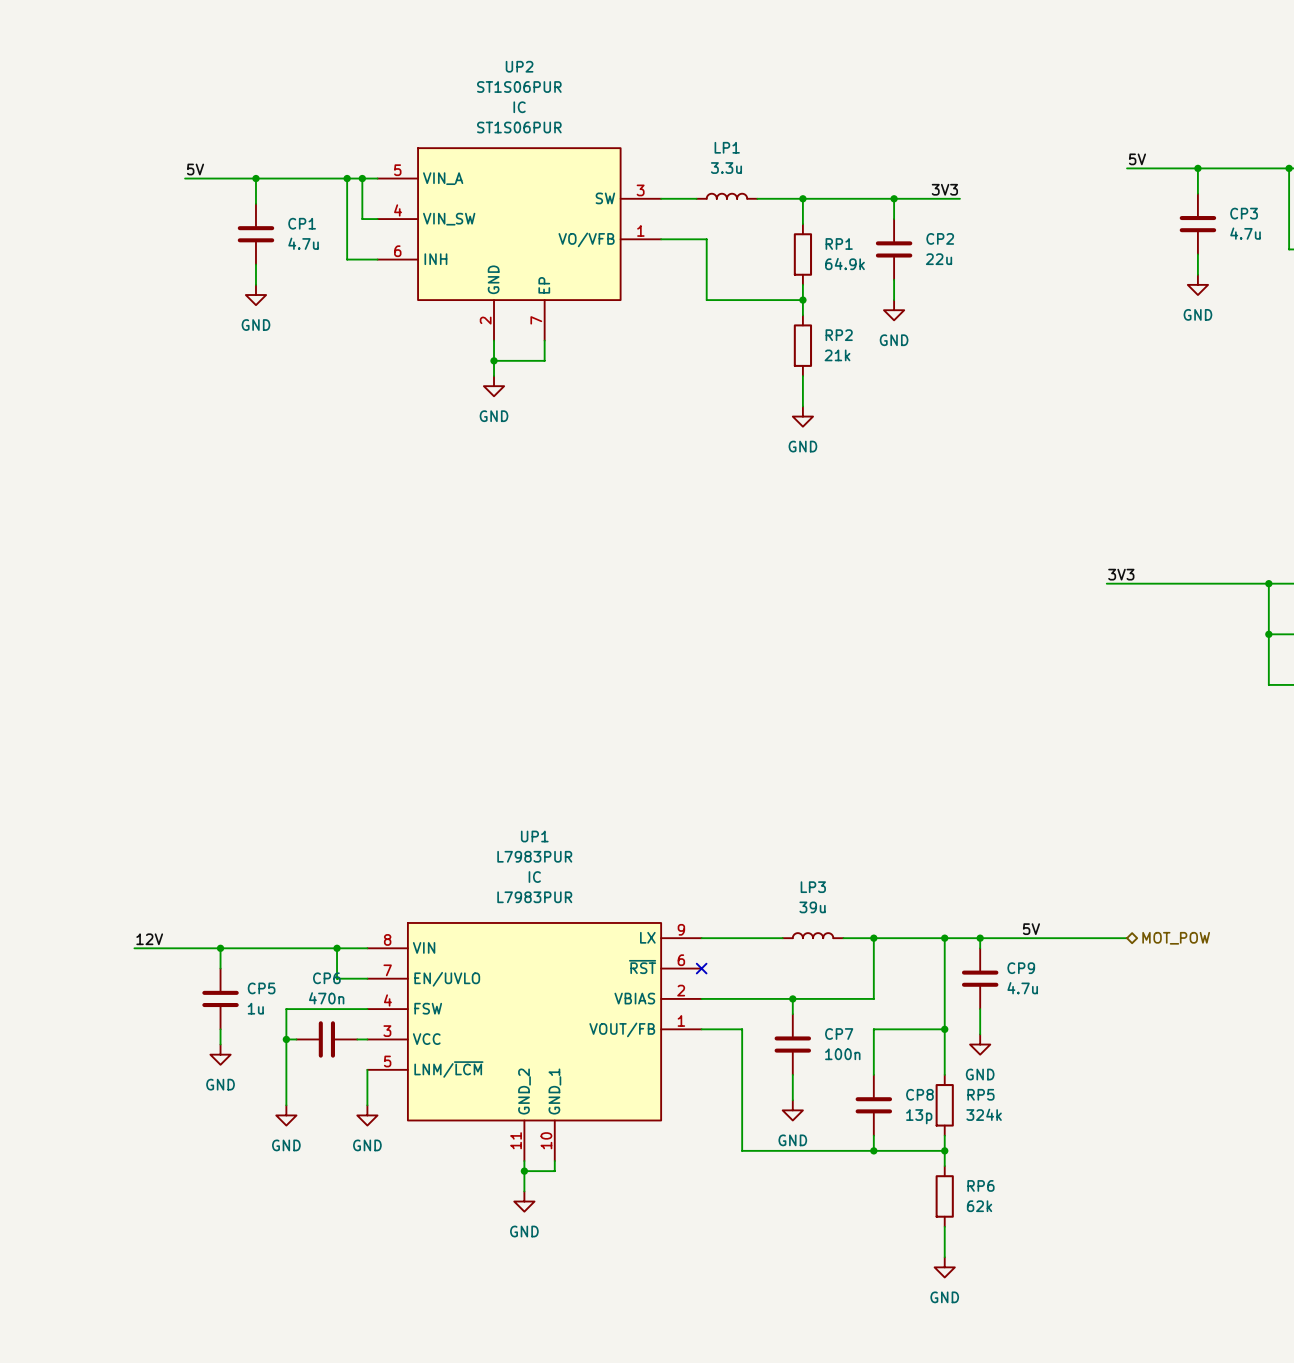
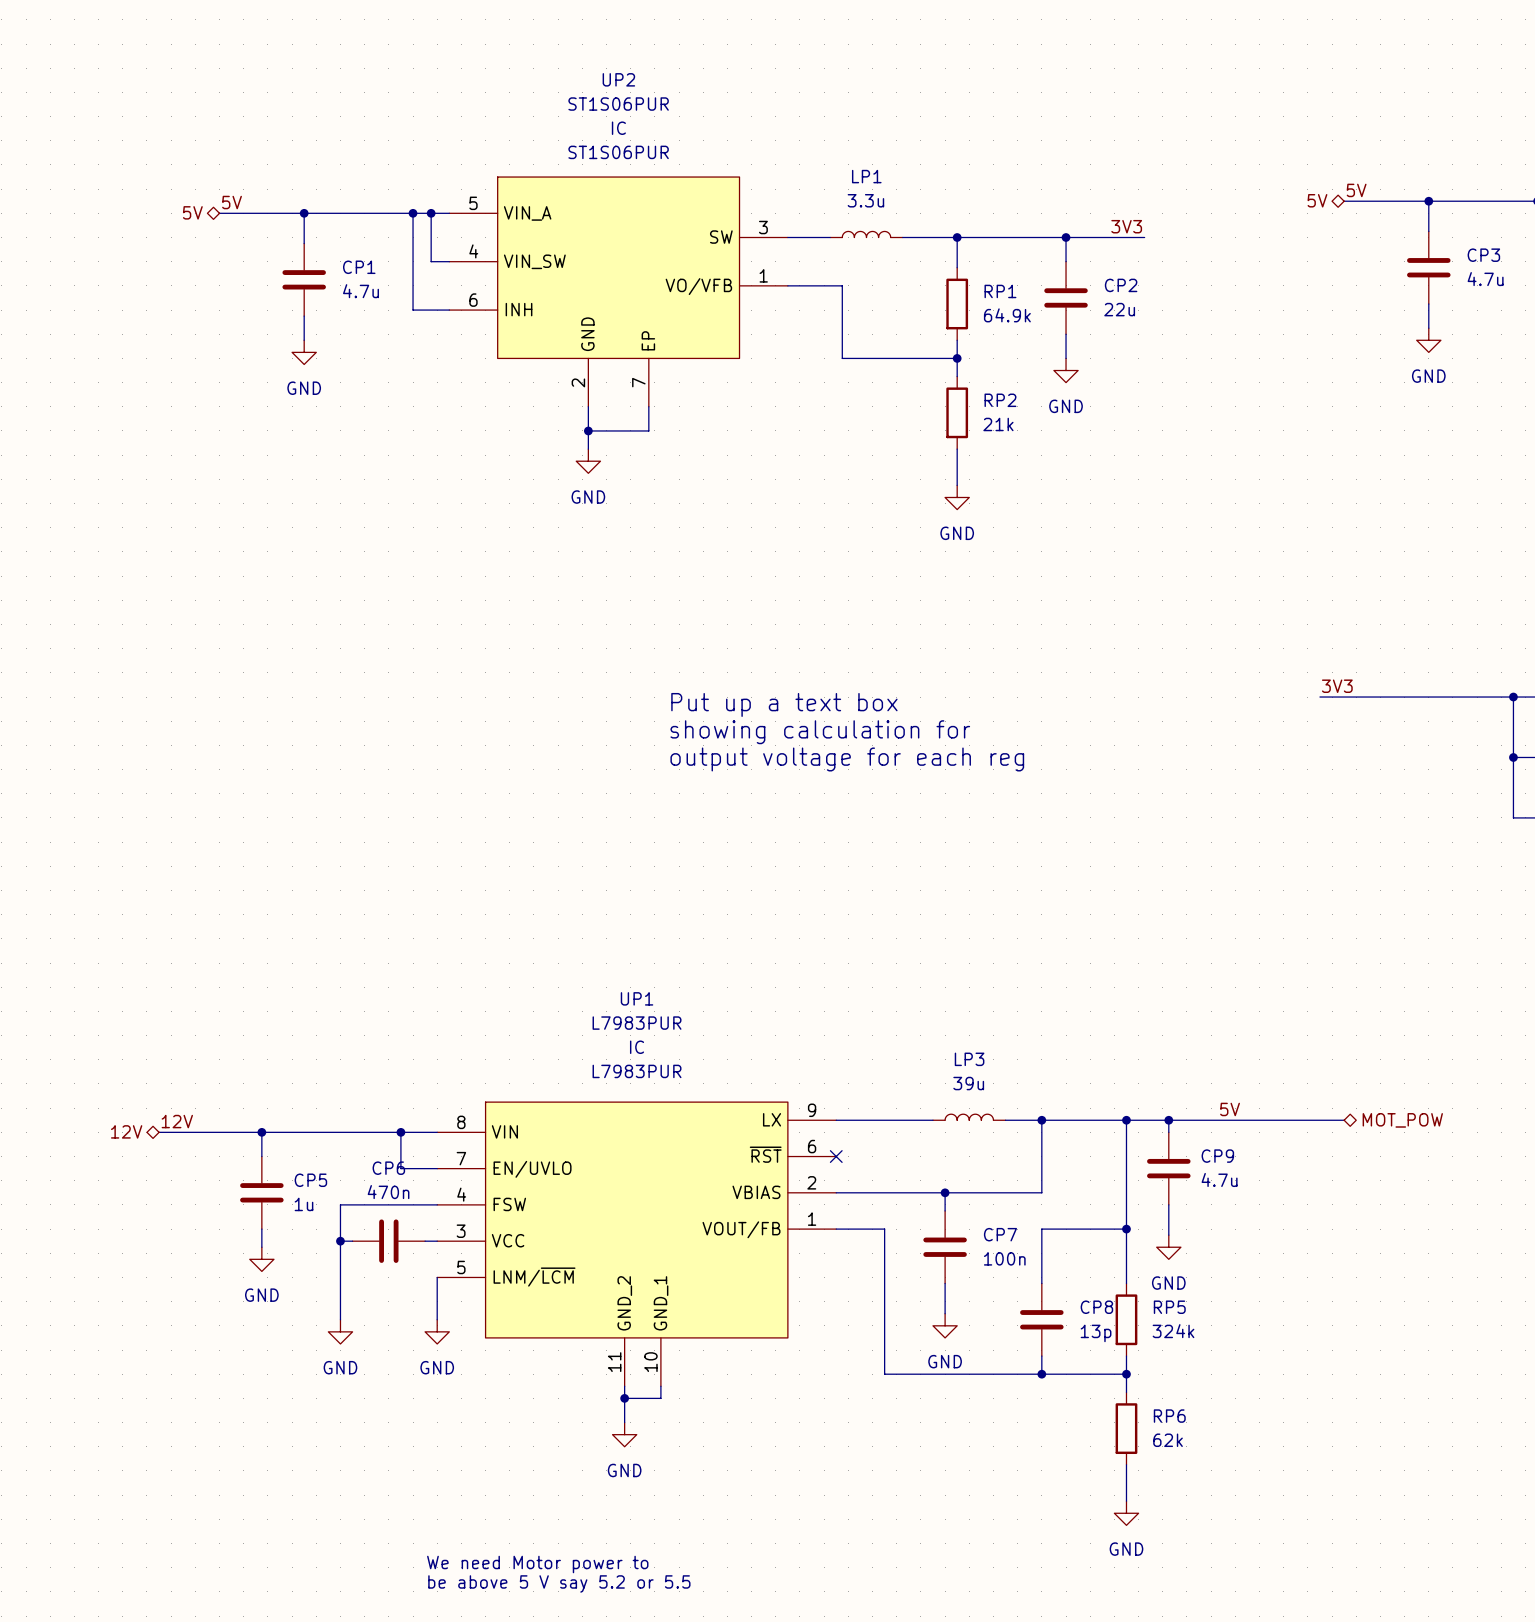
hierarchical label: none -> 5V (1317, 200)
hierarchical label: none -> 5V (192, 212)
text: none -> Put up a text box (784, 704)
text: none -> showing calculation for (820, 732)
text: none -> output voltage for each reg (847, 759)
hierarchical label: none -> 12V (126, 1131)
text: none -> We need Motor power to (537, 1564)
text: none -> be above 5 V say 5.2 or 5.5 (559, 1583)

